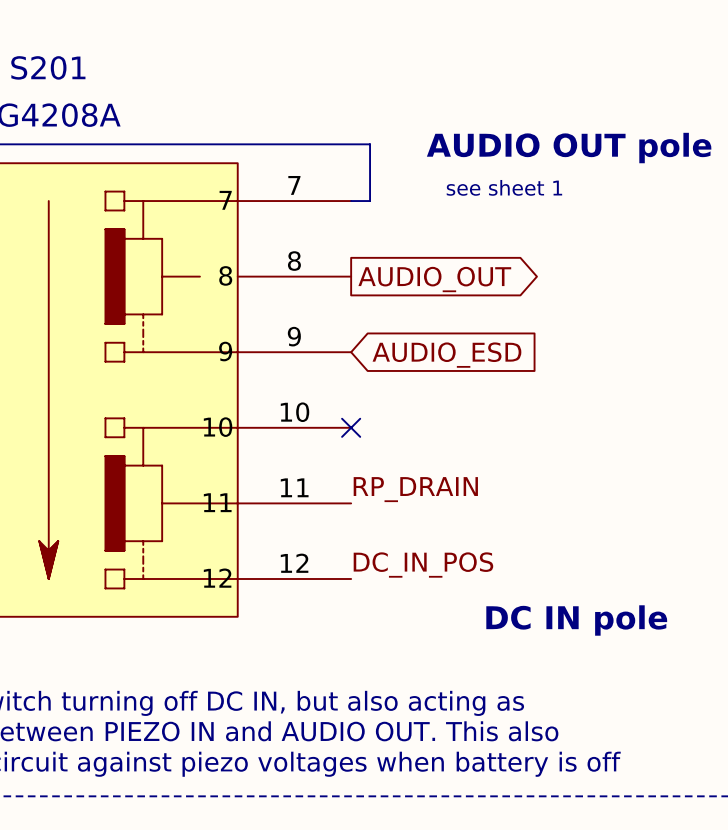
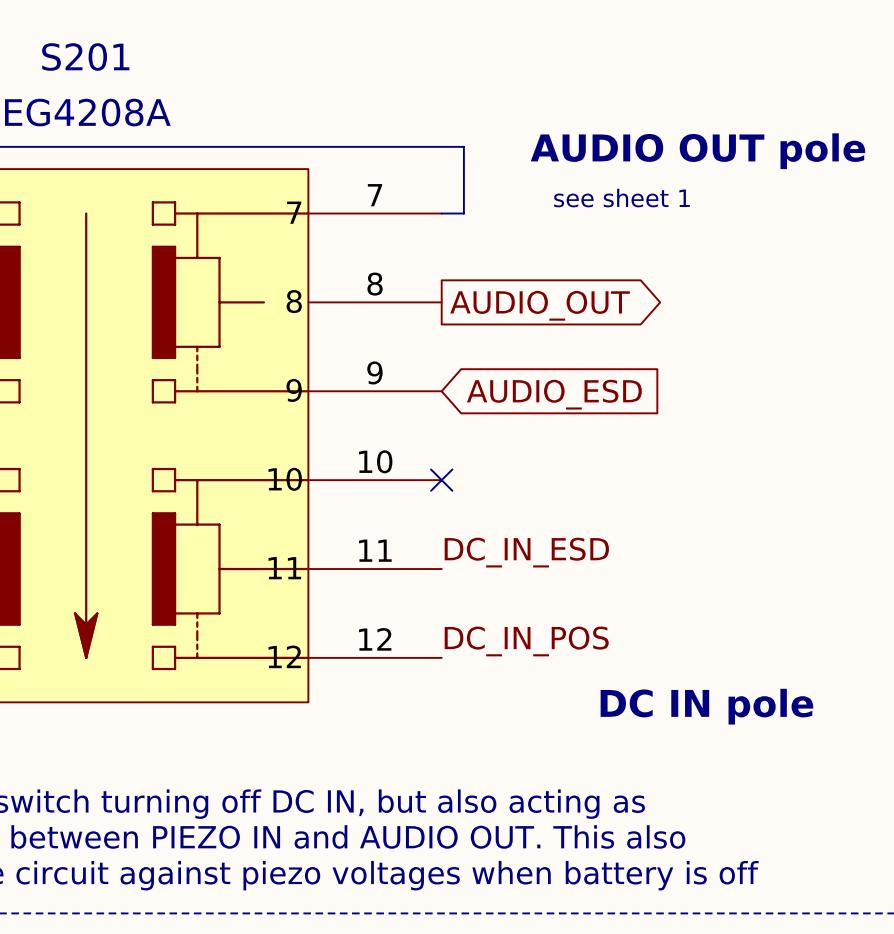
label: RP_DRAIN (415, 489) -> DC_IN_ESD (526, 552)

